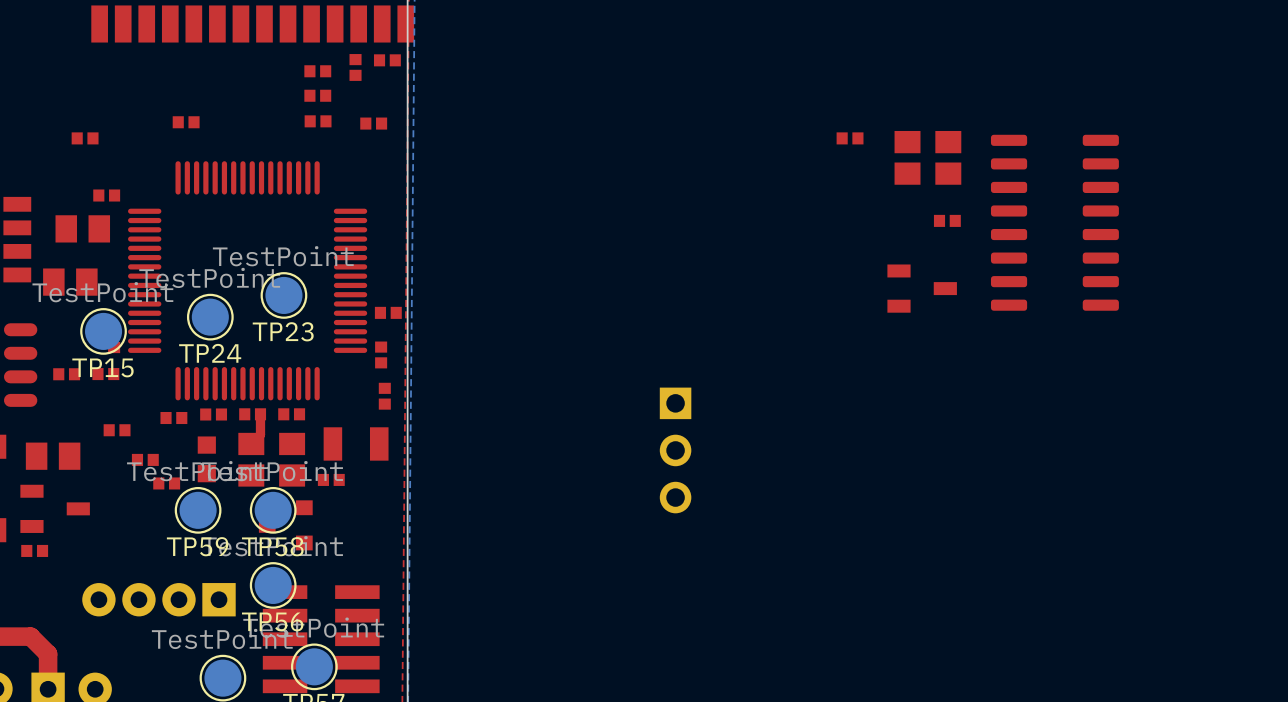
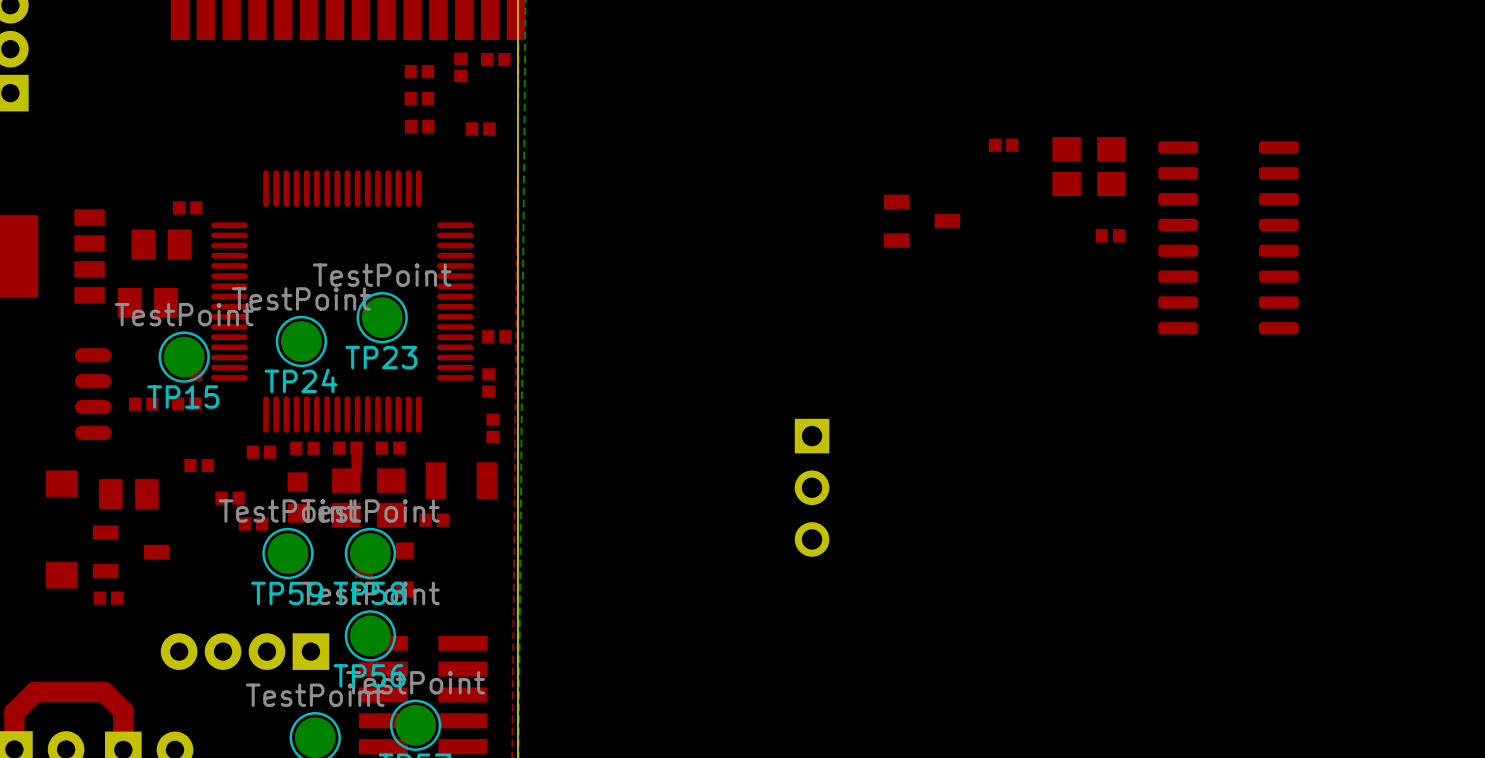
part: (186, 122) -> none
part: (85, 138) -> none
part position: (922, 288) -> (921, 221)

